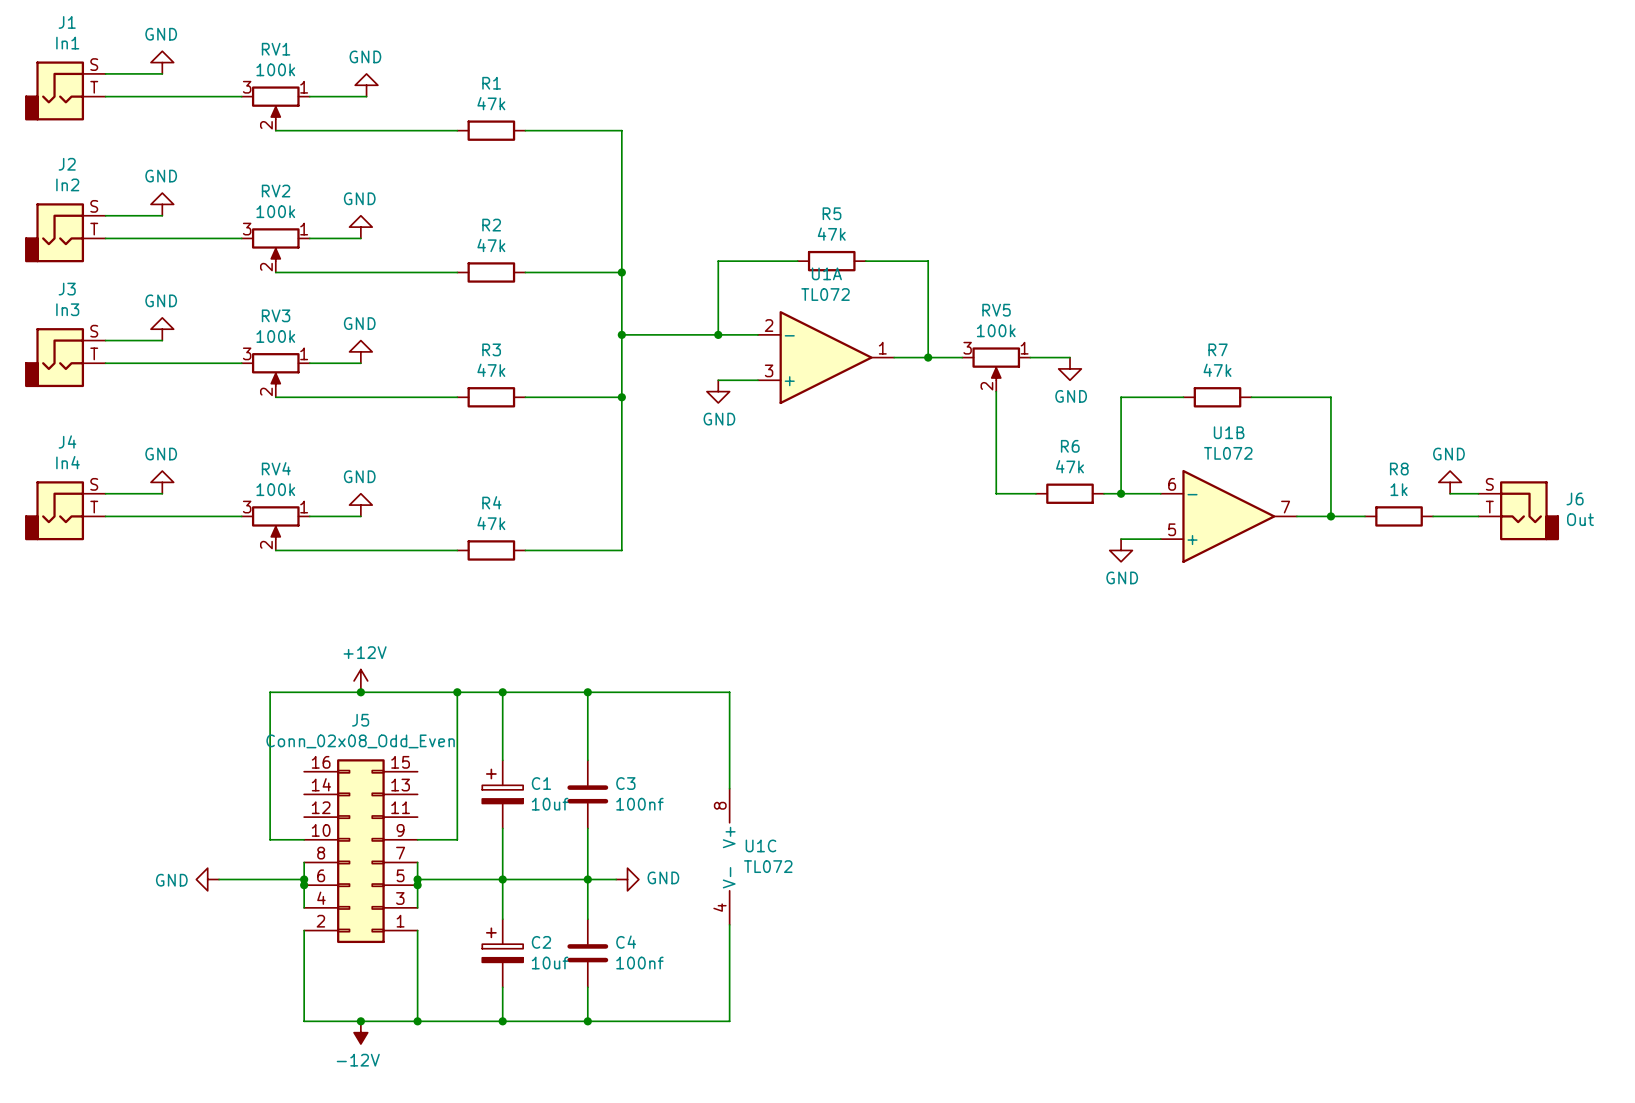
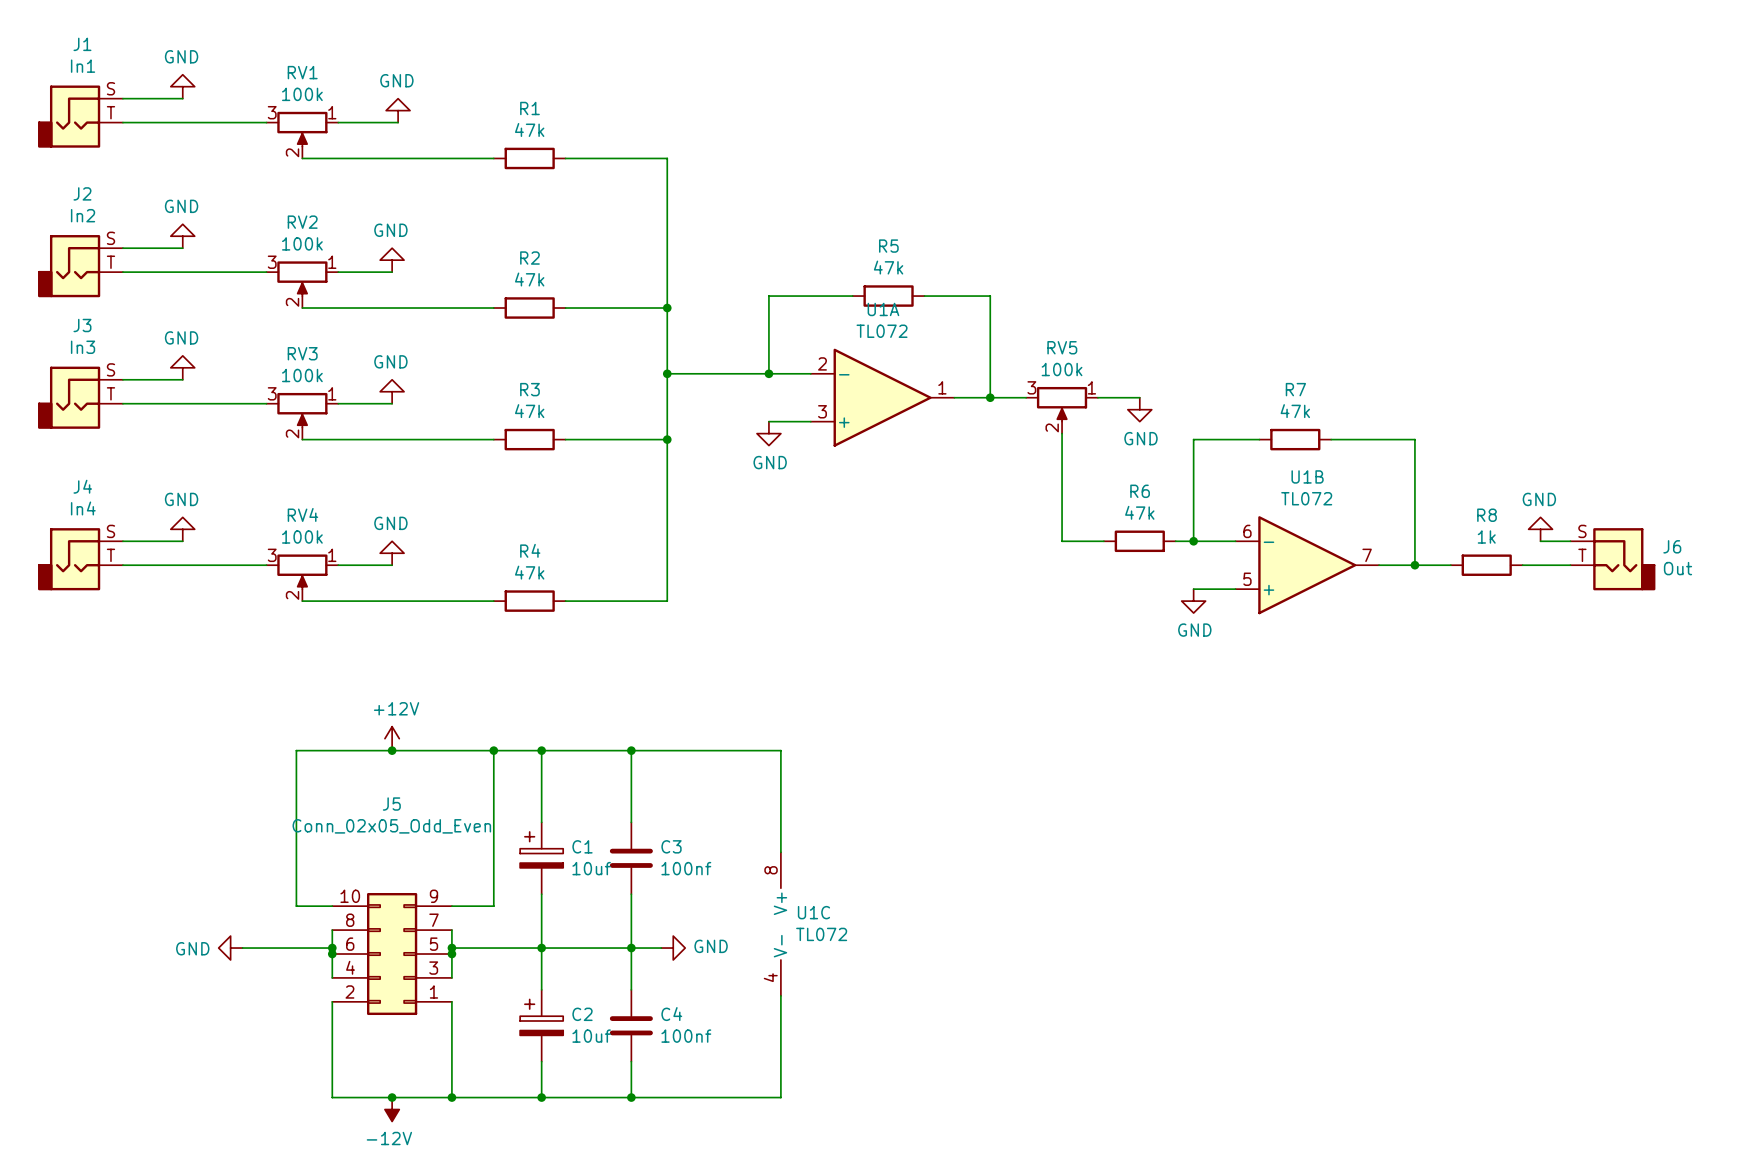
J5 value: Conn_02x08_Odd_Even (360, 741) -> Conn_02x05_Odd_Even (391, 826)
J5 symbol: [304, 759, 418, 944] -> [332, 892, 452, 1016]

